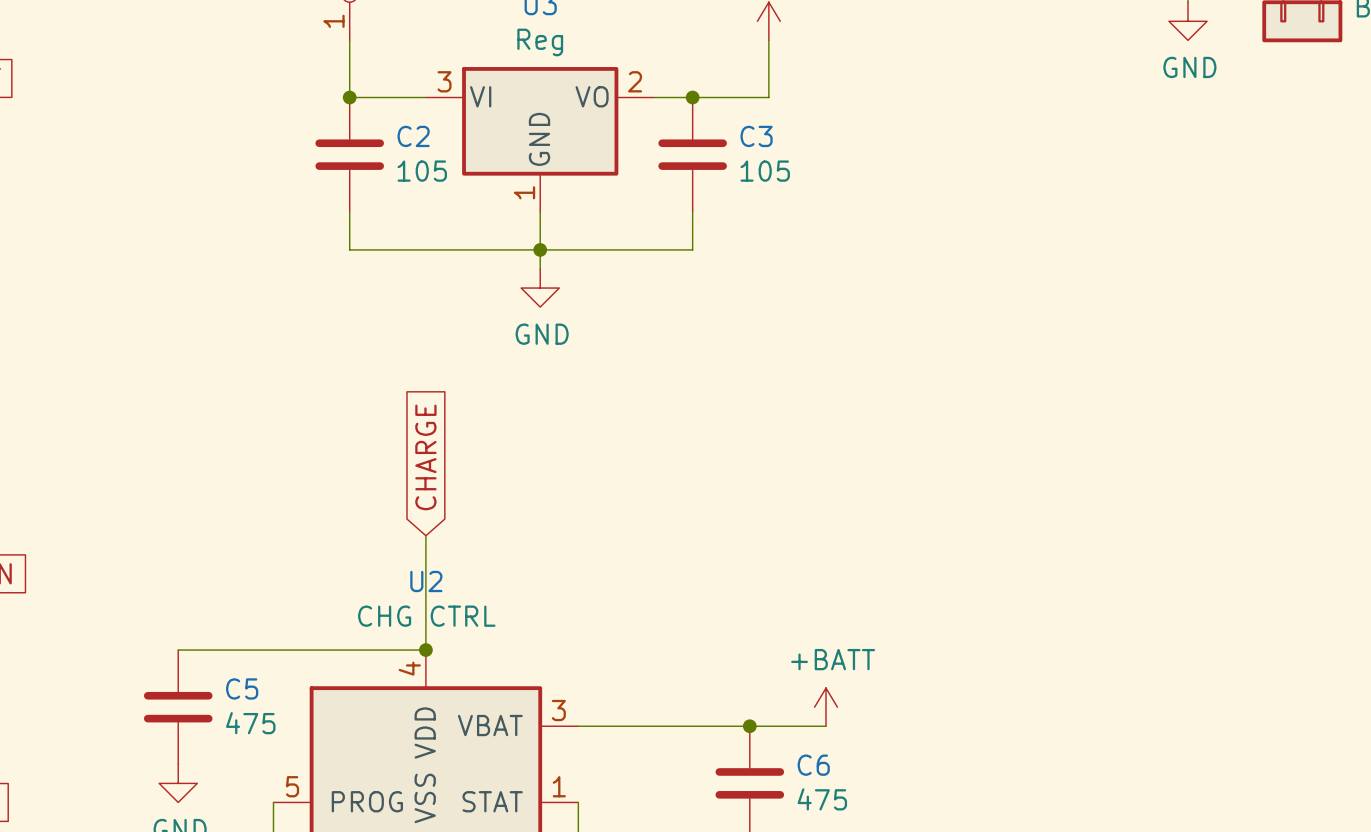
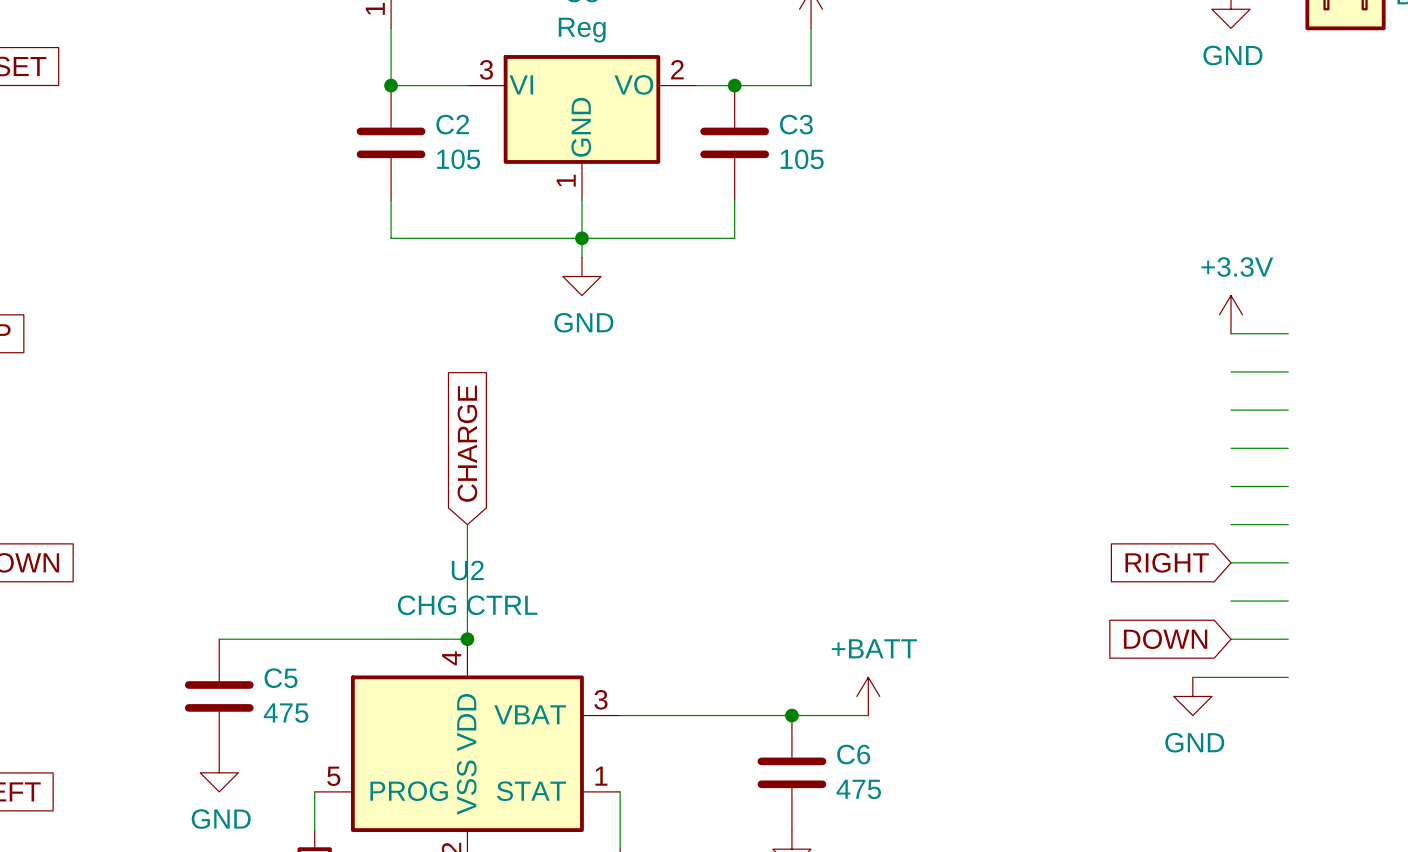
power symbol: none -> +3.3V (1230, 314)
wire: none -> (1230, 333) (1288, 333)
wire: none -> (1230, 371) (1288, 371)
wire: none -> (1230, 410) (1288, 410)
wire: none -> (1230, 448) (1288, 448)
wire: none -> (1230, 486) (1288, 486)
wire: none -> (1230, 524) (1288, 524)
global label: none -> RIGHT (1167, 562)
wire: none -> (1230, 562) (1288, 562)
wire: none -> (1230, 601) (1288, 601)
global label: none -> DOWN (1165, 639)
wire: none -> (1230, 639) (1288, 639)
wire: none -> (1192, 677) (1288, 677)
power symbol: none -> GND (1192, 696)

